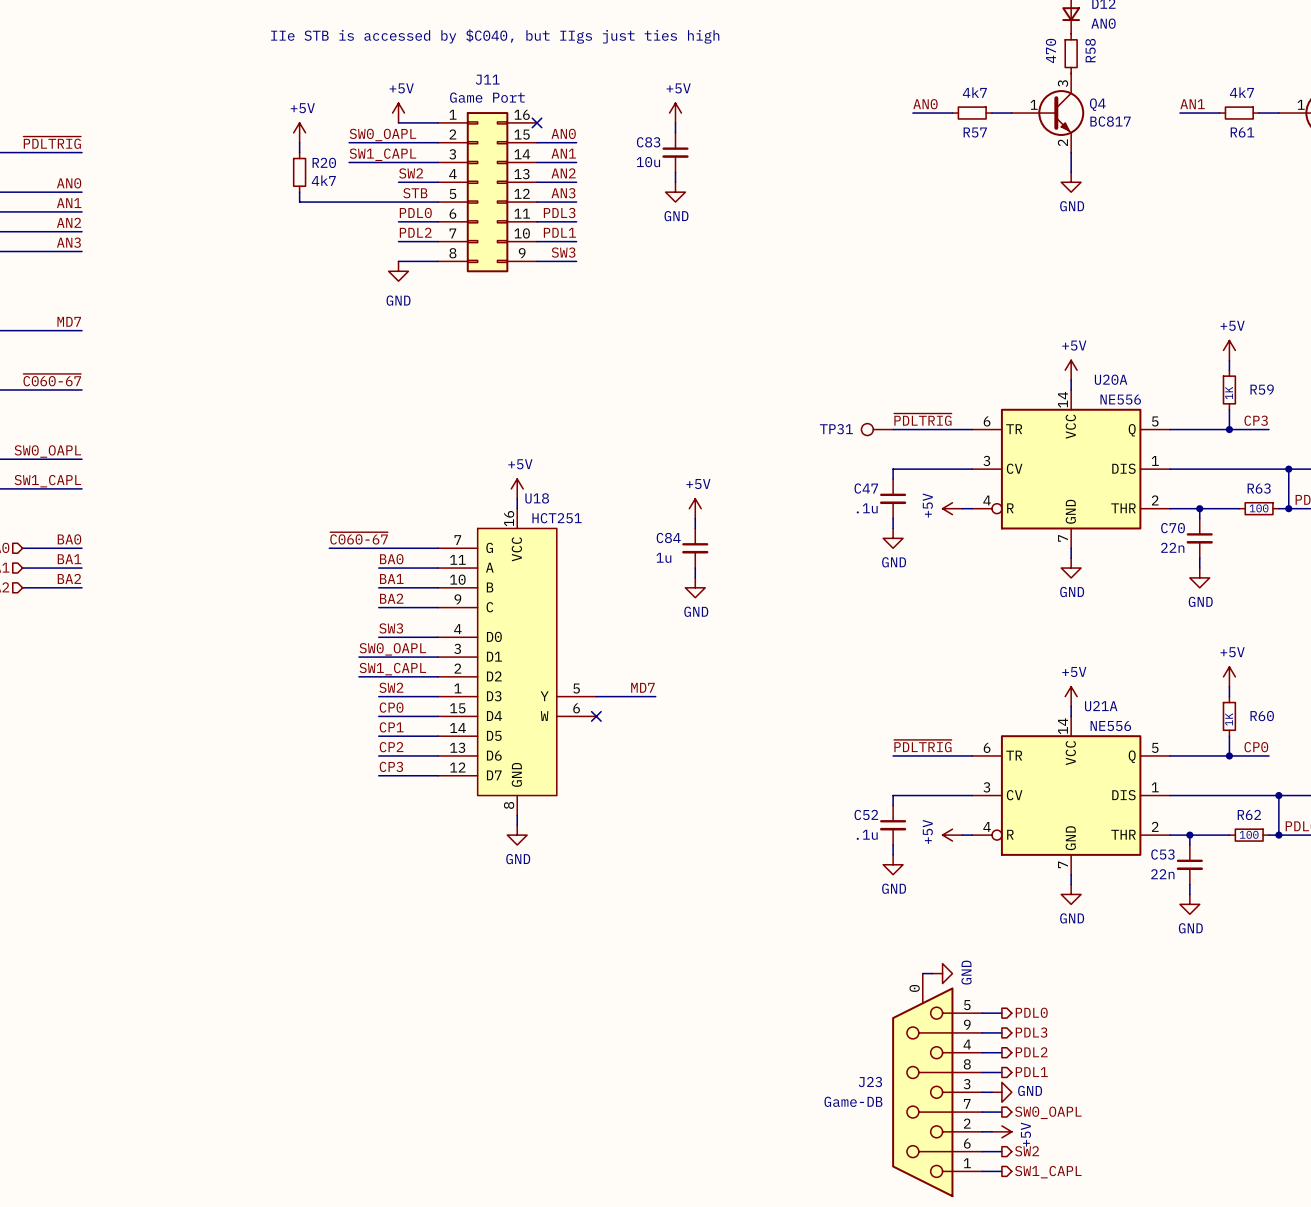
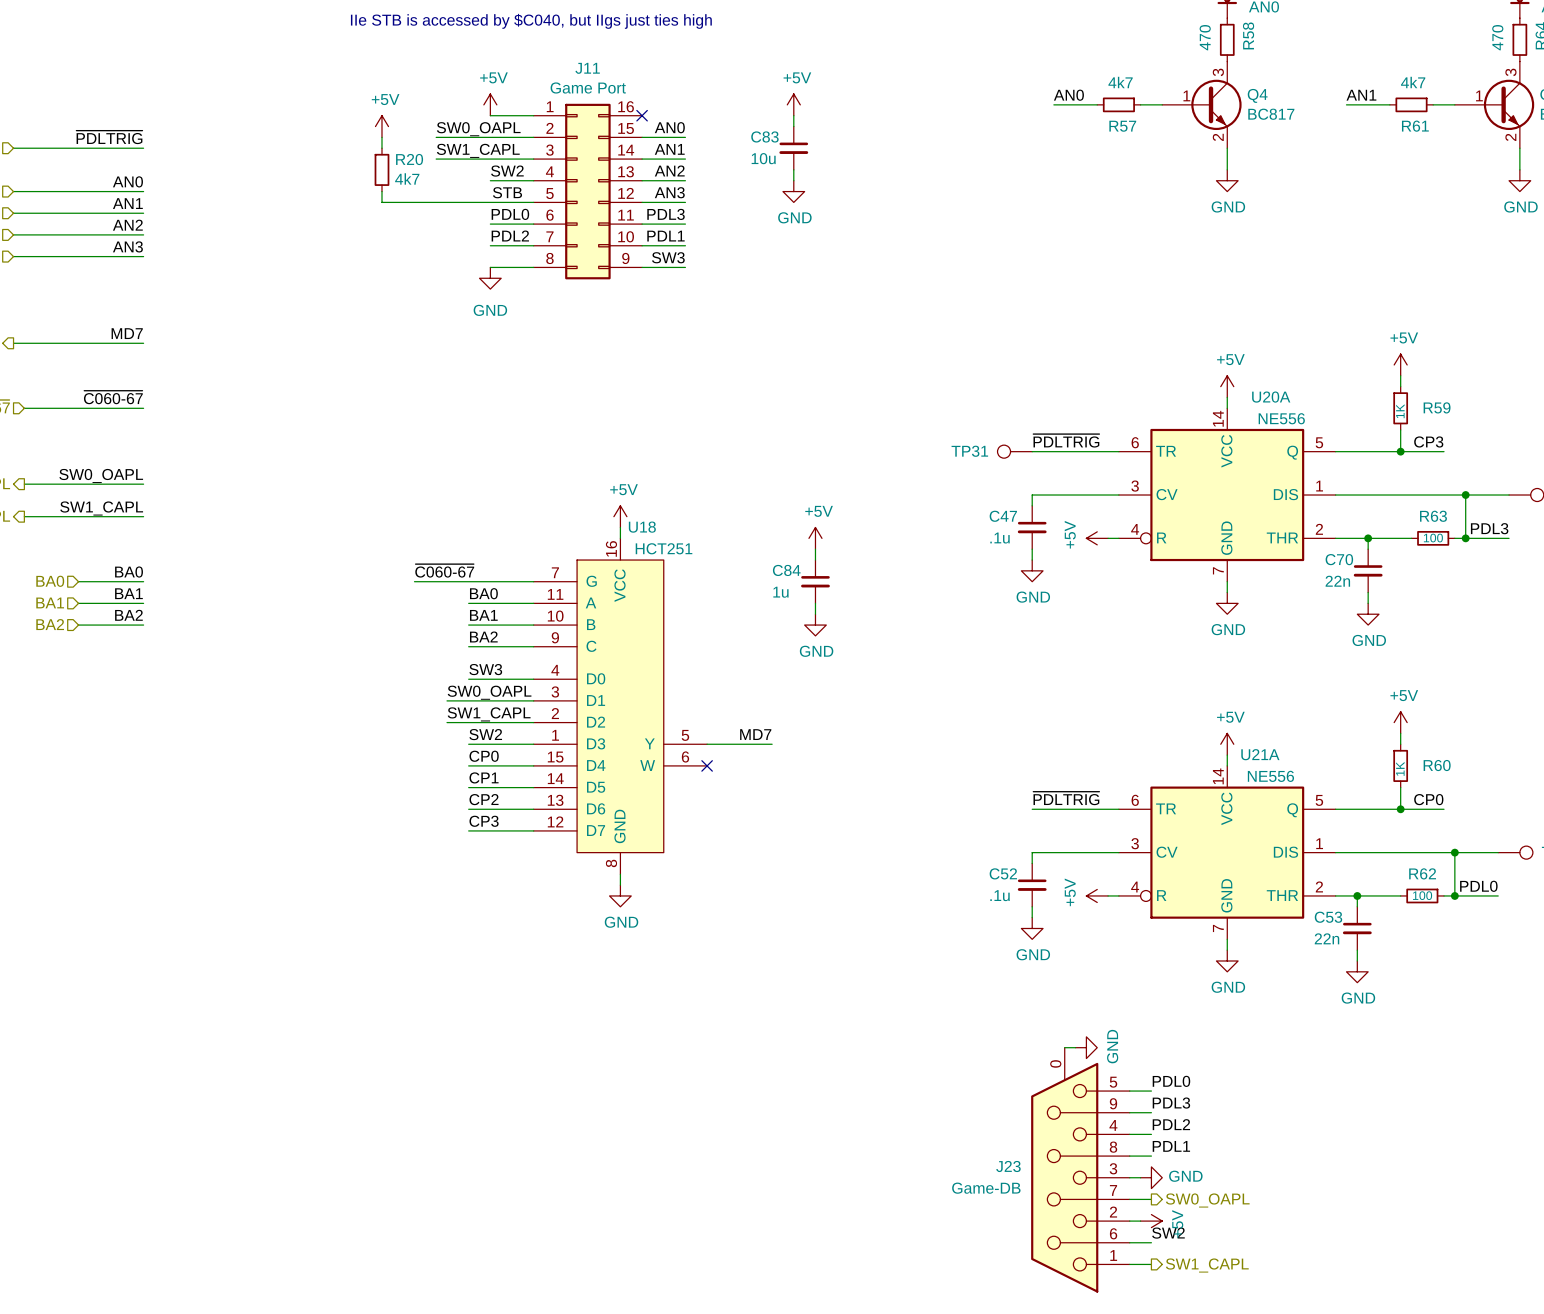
label: none -> PDL0 (1171, 1081)
hierarchical label: PDL0 (1031, 1012) -> none
label: none -> PDL3 (1171, 1103)
hierarchical label: PDL3 (1031, 1032) -> none
label: none -> PDL2 (1171, 1124)
hierarchical label: PDL2 (1031, 1052) -> none
label: none -> PDL1 (1171, 1146)
hierarchical label: PDL1 (1031, 1072) -> none
label: none -> SW2 (1168, 1233)
hierarchical label: SW2 (1027, 1151) -> none

